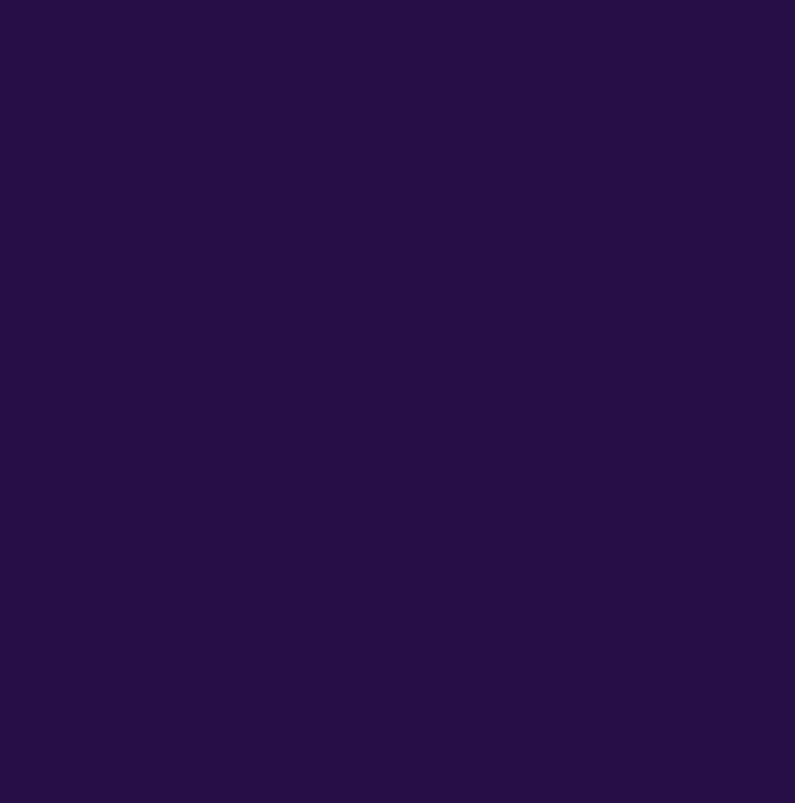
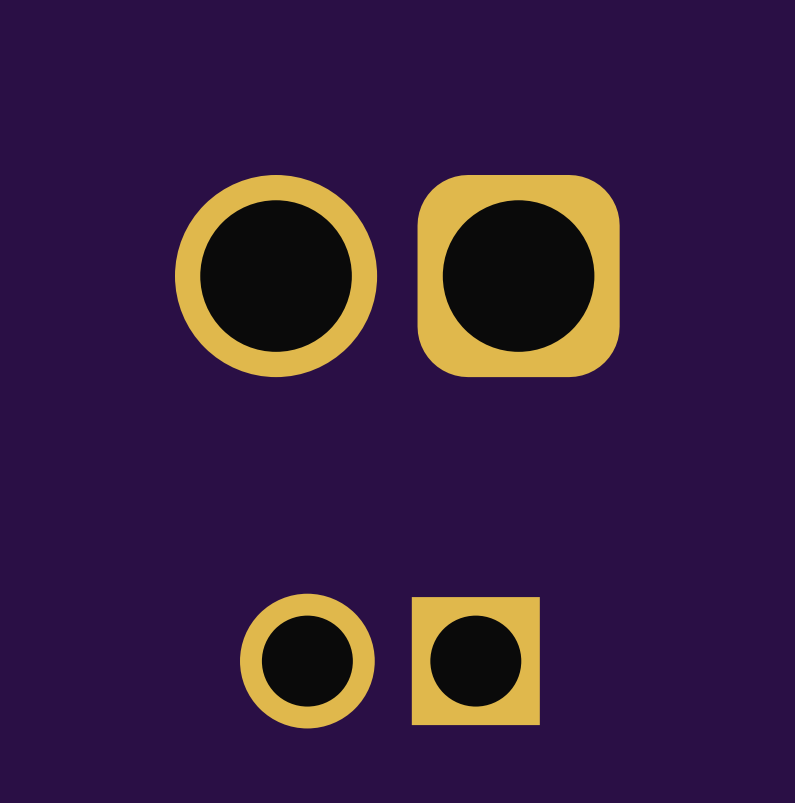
part: none -> (397, 276)
part: none -> (389, 661)

